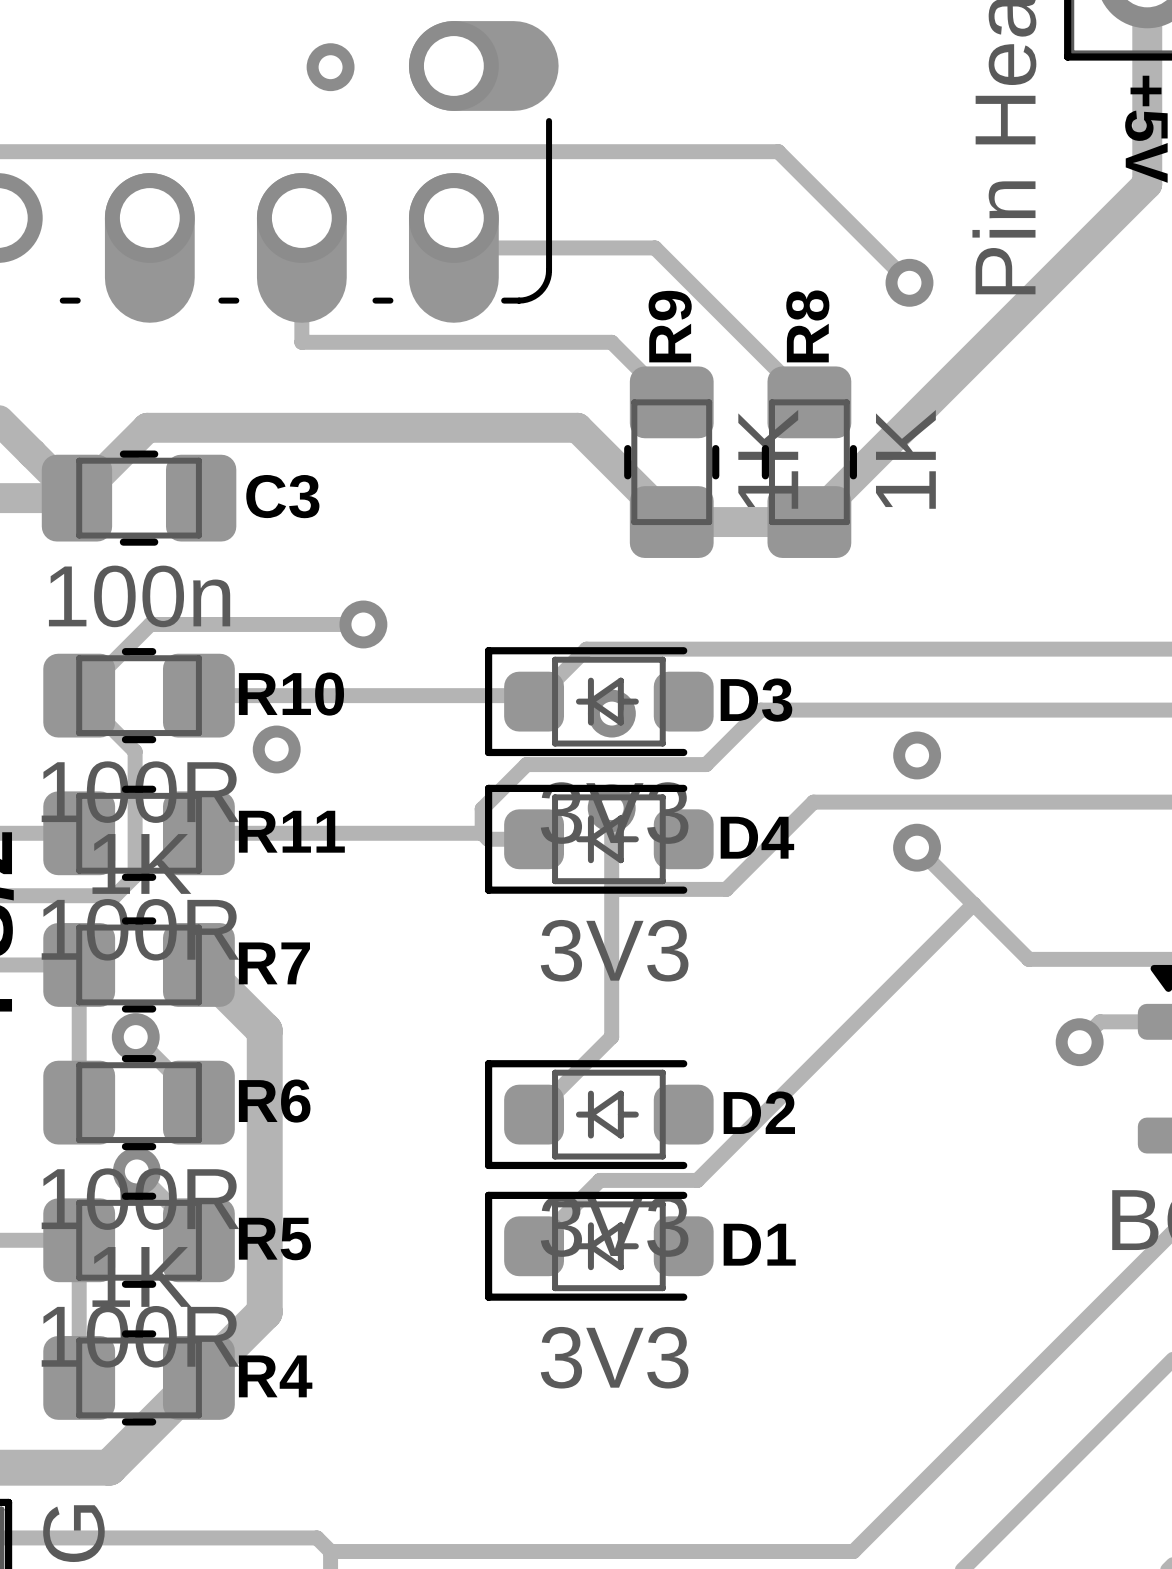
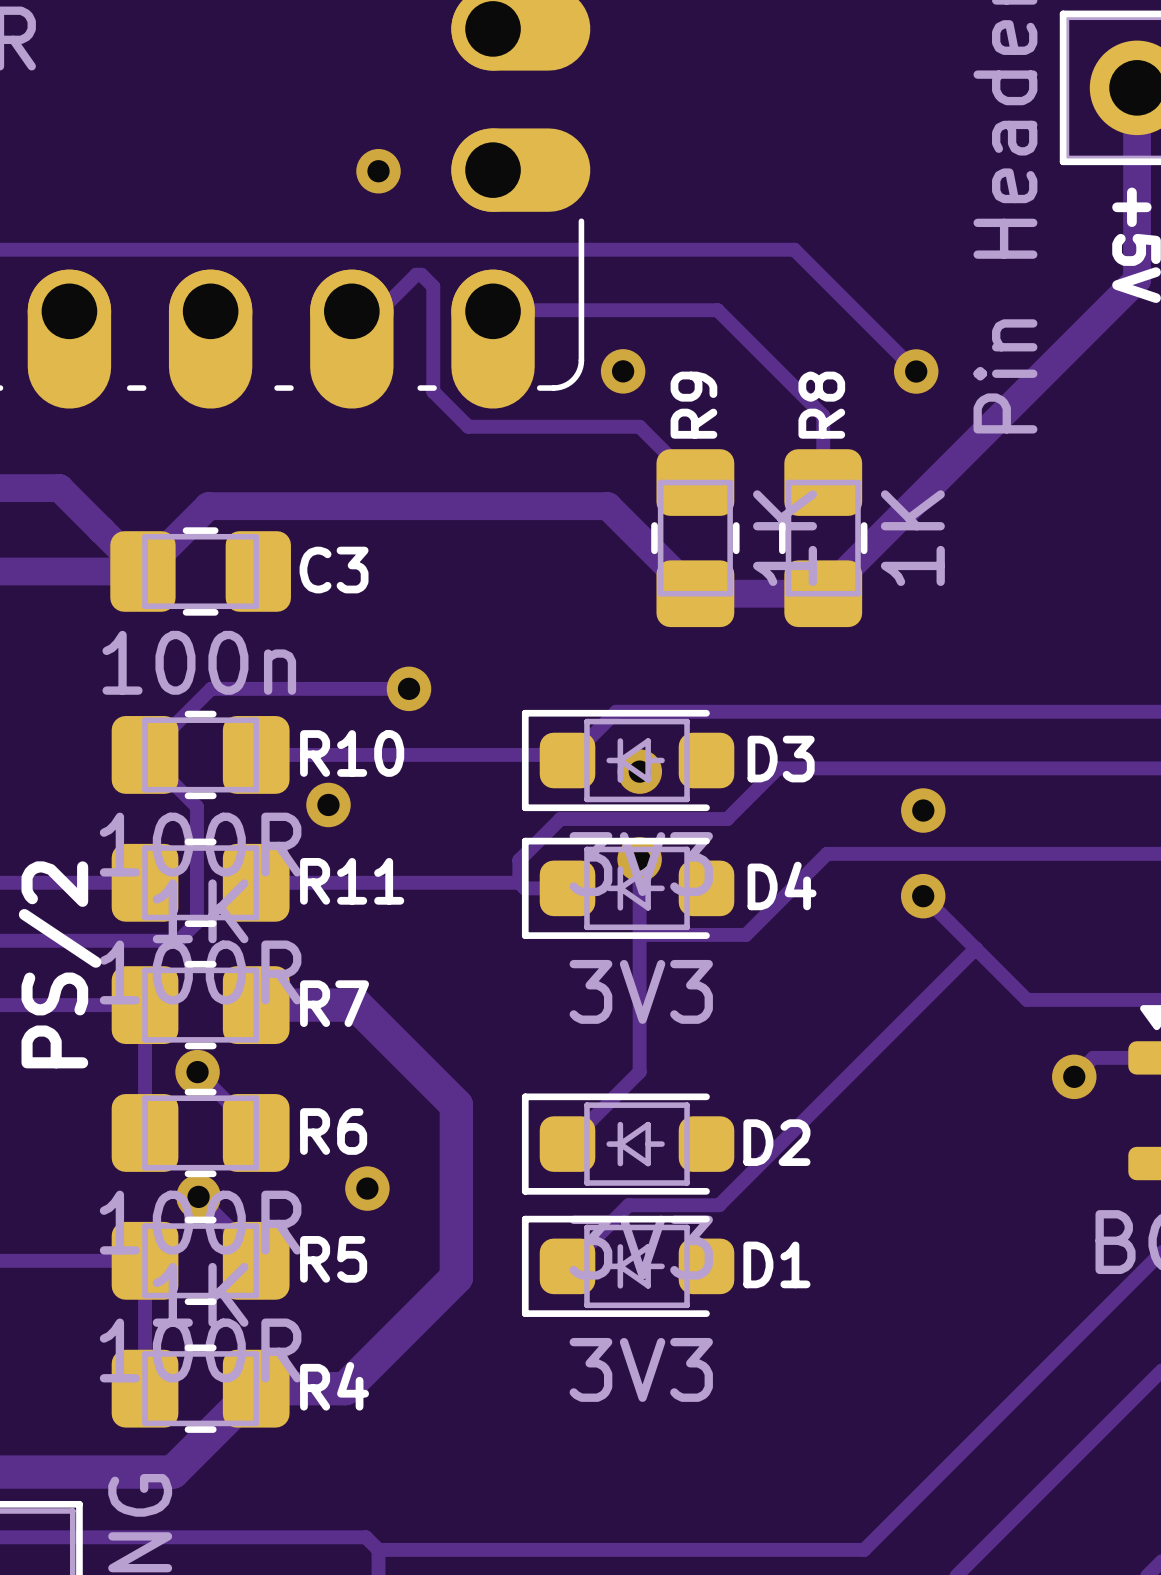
track: (301, 247) (301, 342) (427, 342) -> (351, 339) (416, 274) (421, 274) (433, 286) (433, 391) (468, 426)
track: (453, 247) (654, 247) (809, 402) -> (493, 339) (521, 310) (717, 310) (823, 415) (823, 482)
via: none -> (623, 371)
track: (198, 964) (264, 1030) (264, 1312) (198, 1377) -> (256, 1005) (356, 1005) (456, 1105) (456, 1277) (345, 1388) (256, 1388)
via: none -> (367, 1188)

